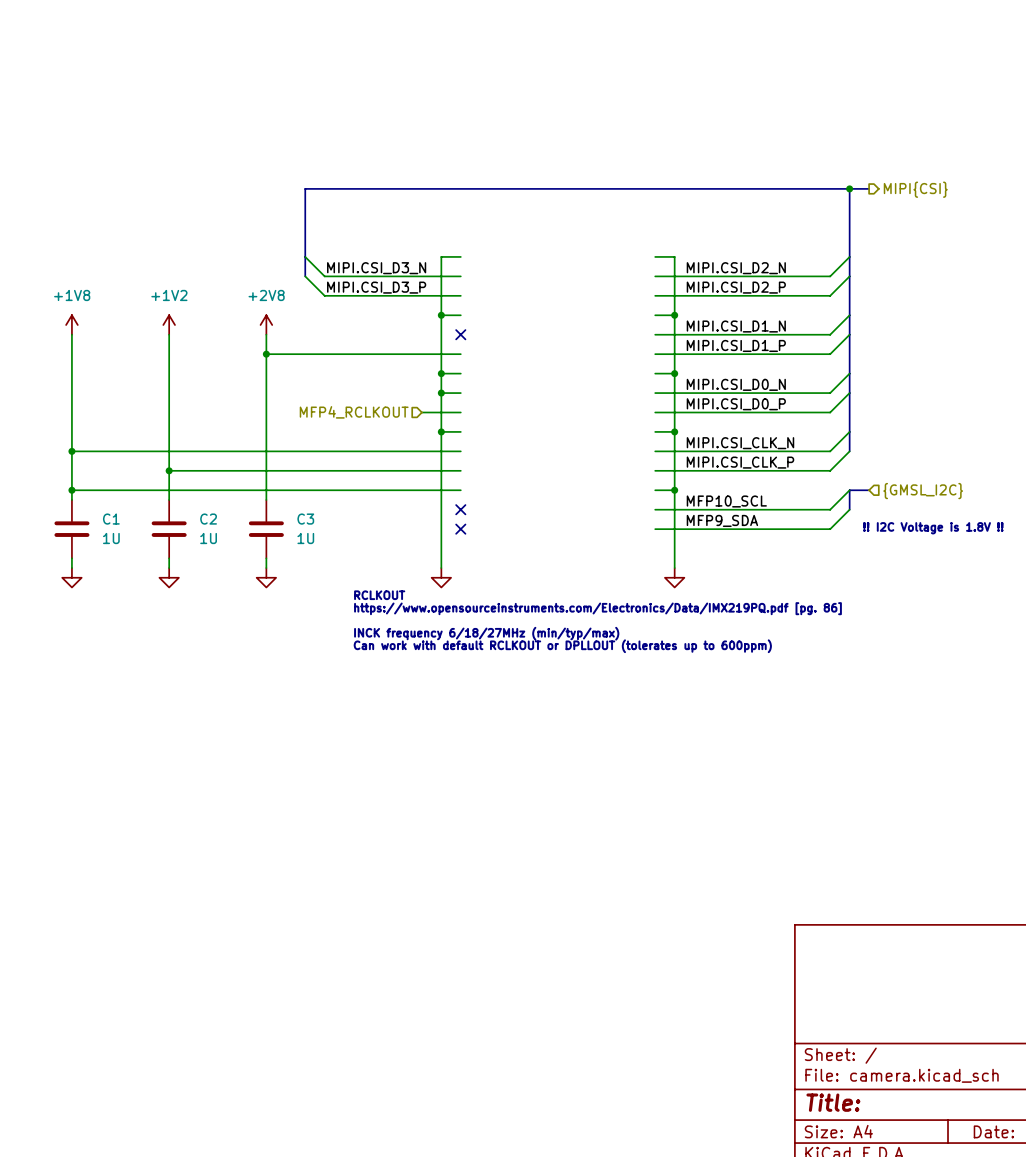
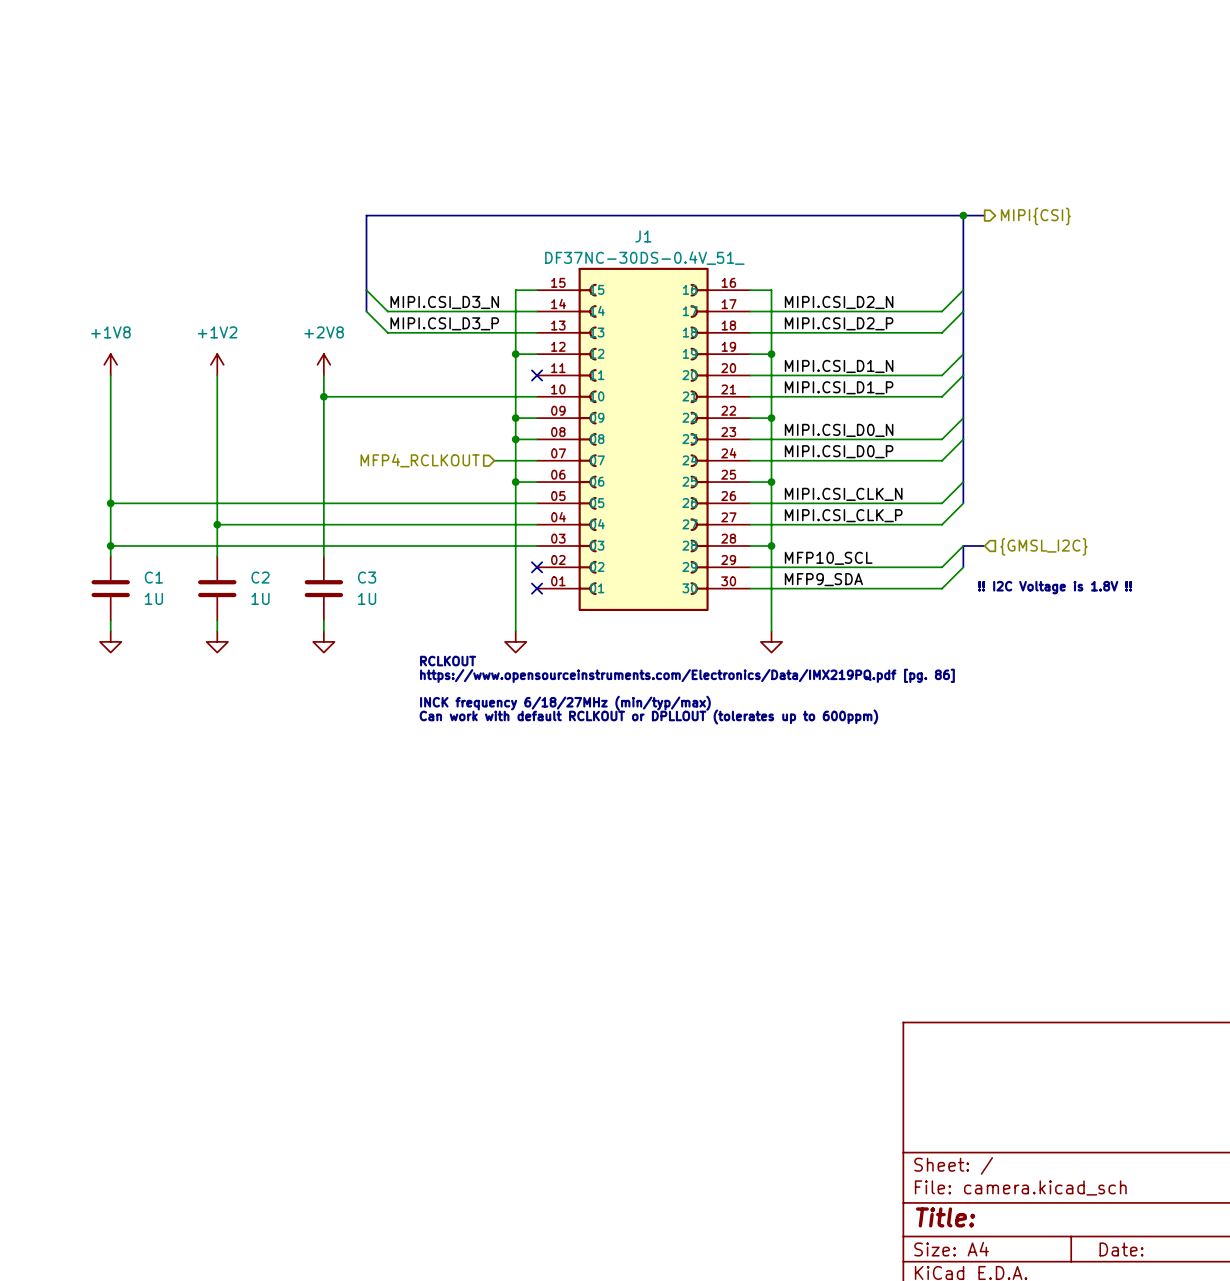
J1: none -> DF37NC-30DS-0.4V_51_ (643, 439)

